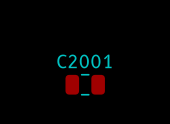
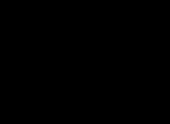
C2001: (85, 84) -> none

